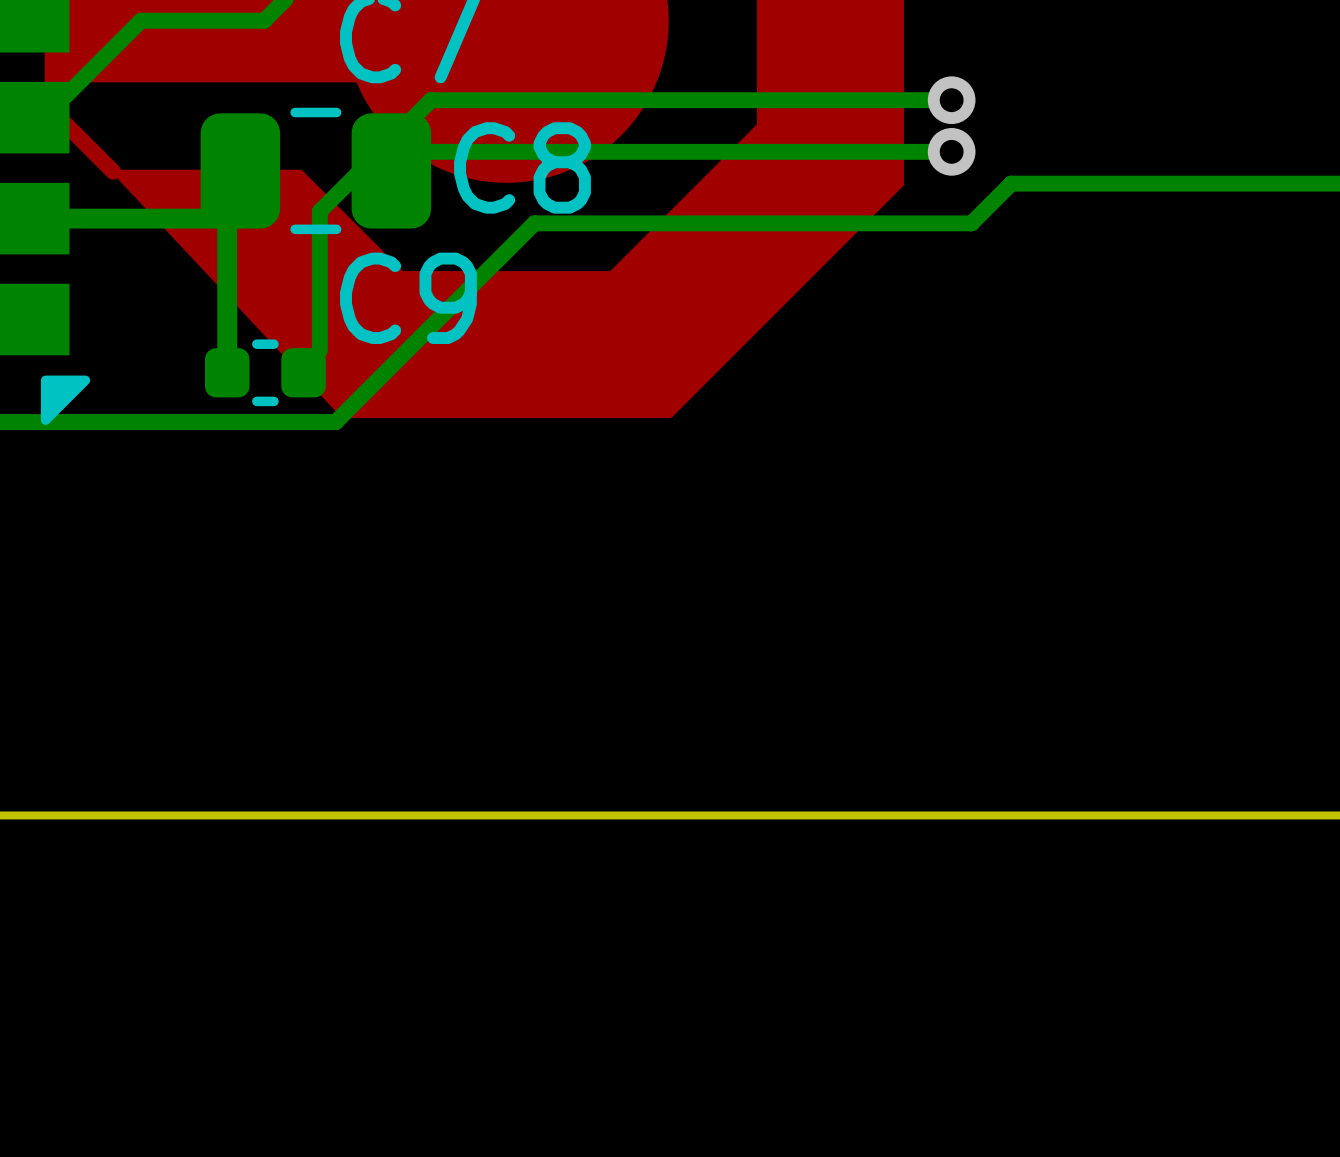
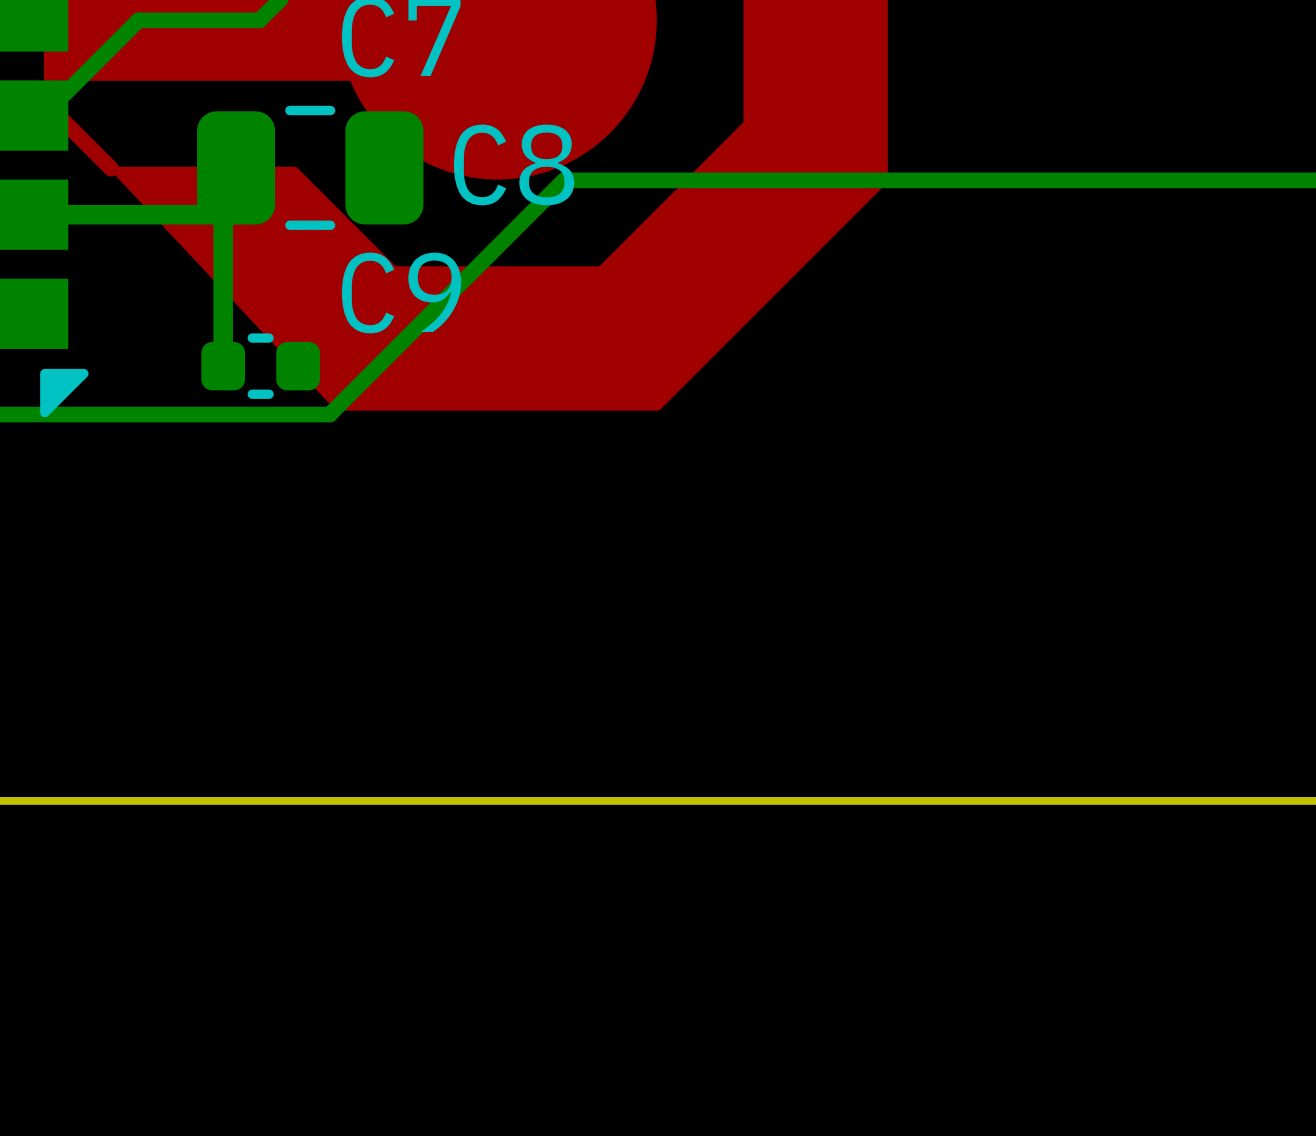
bottom track: (951, 100) (431, 100) (319, 211) (319, 350) -> none
via: (951, 100) -> none
bottom track: (951, 151) (431, 151) -> none
via: (951, 151) -> none
bottom track: (1011, 183) (971, 223) (534, 223) -> (993, 180) (563, 180) (524, 219)

